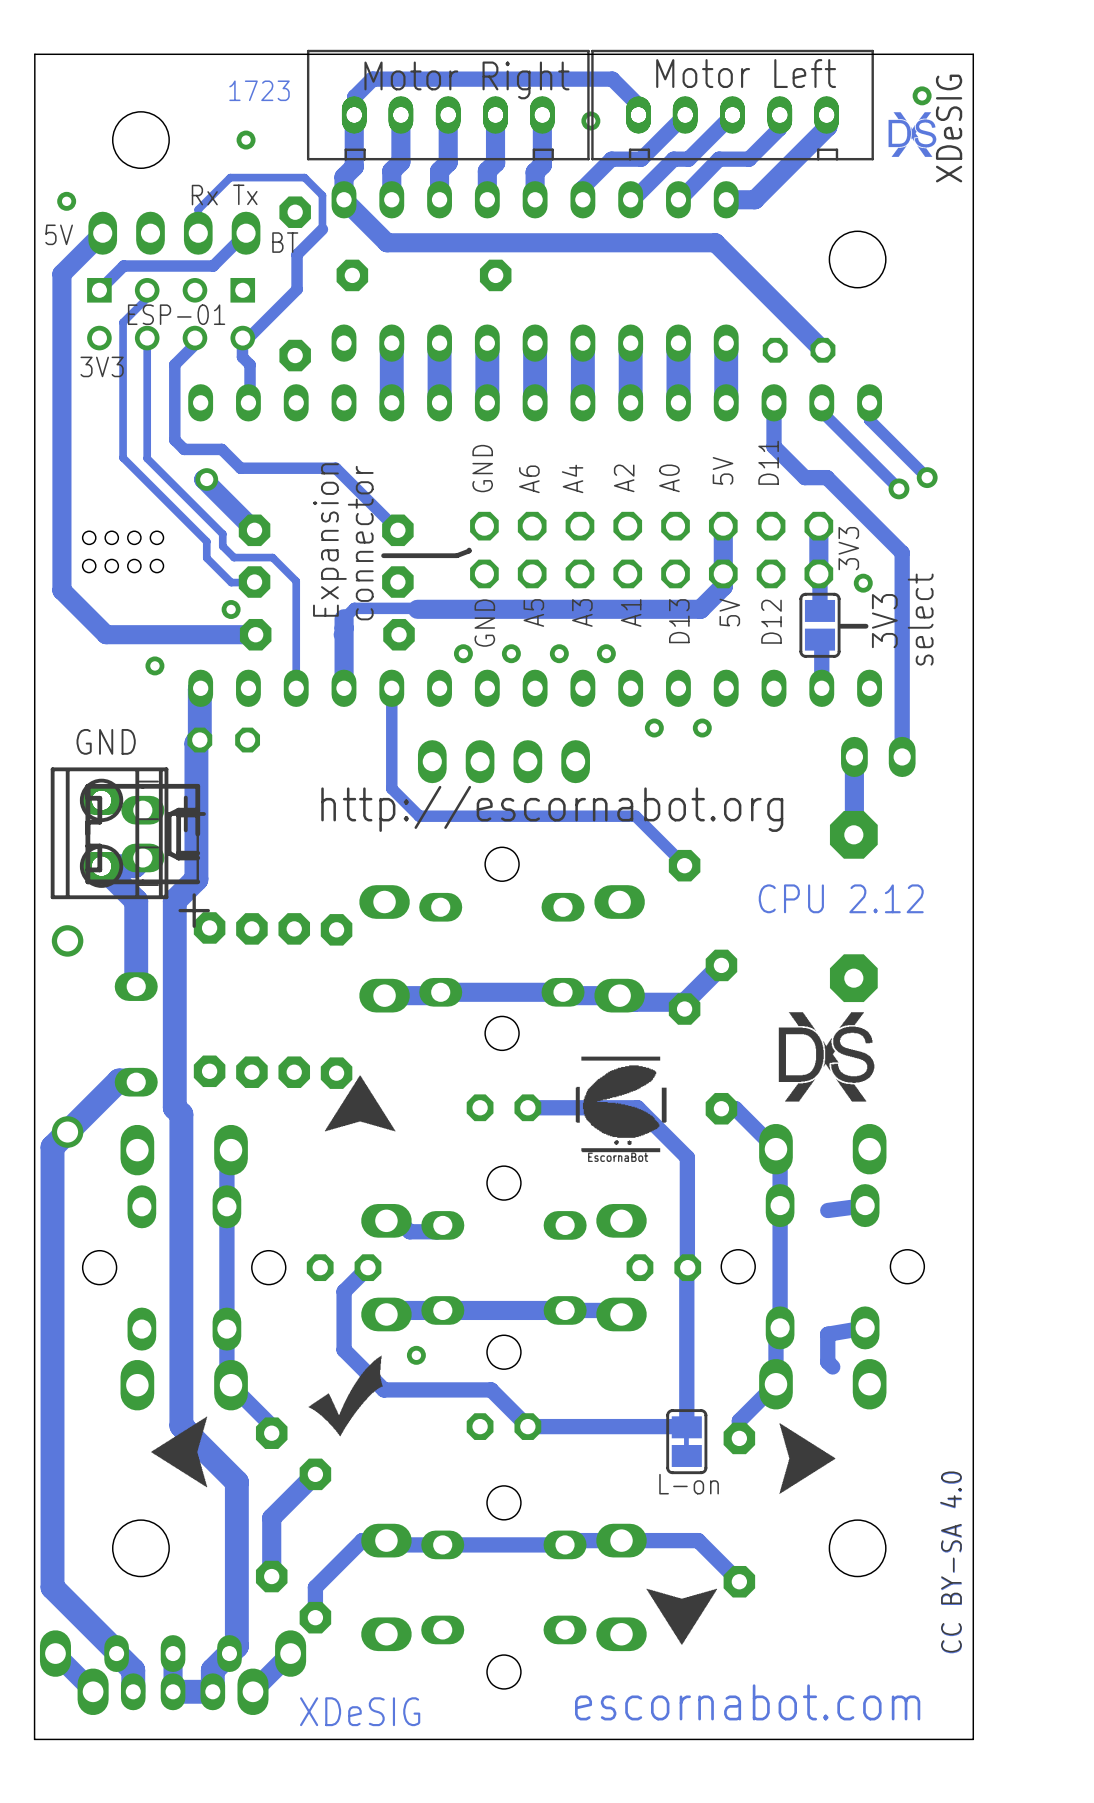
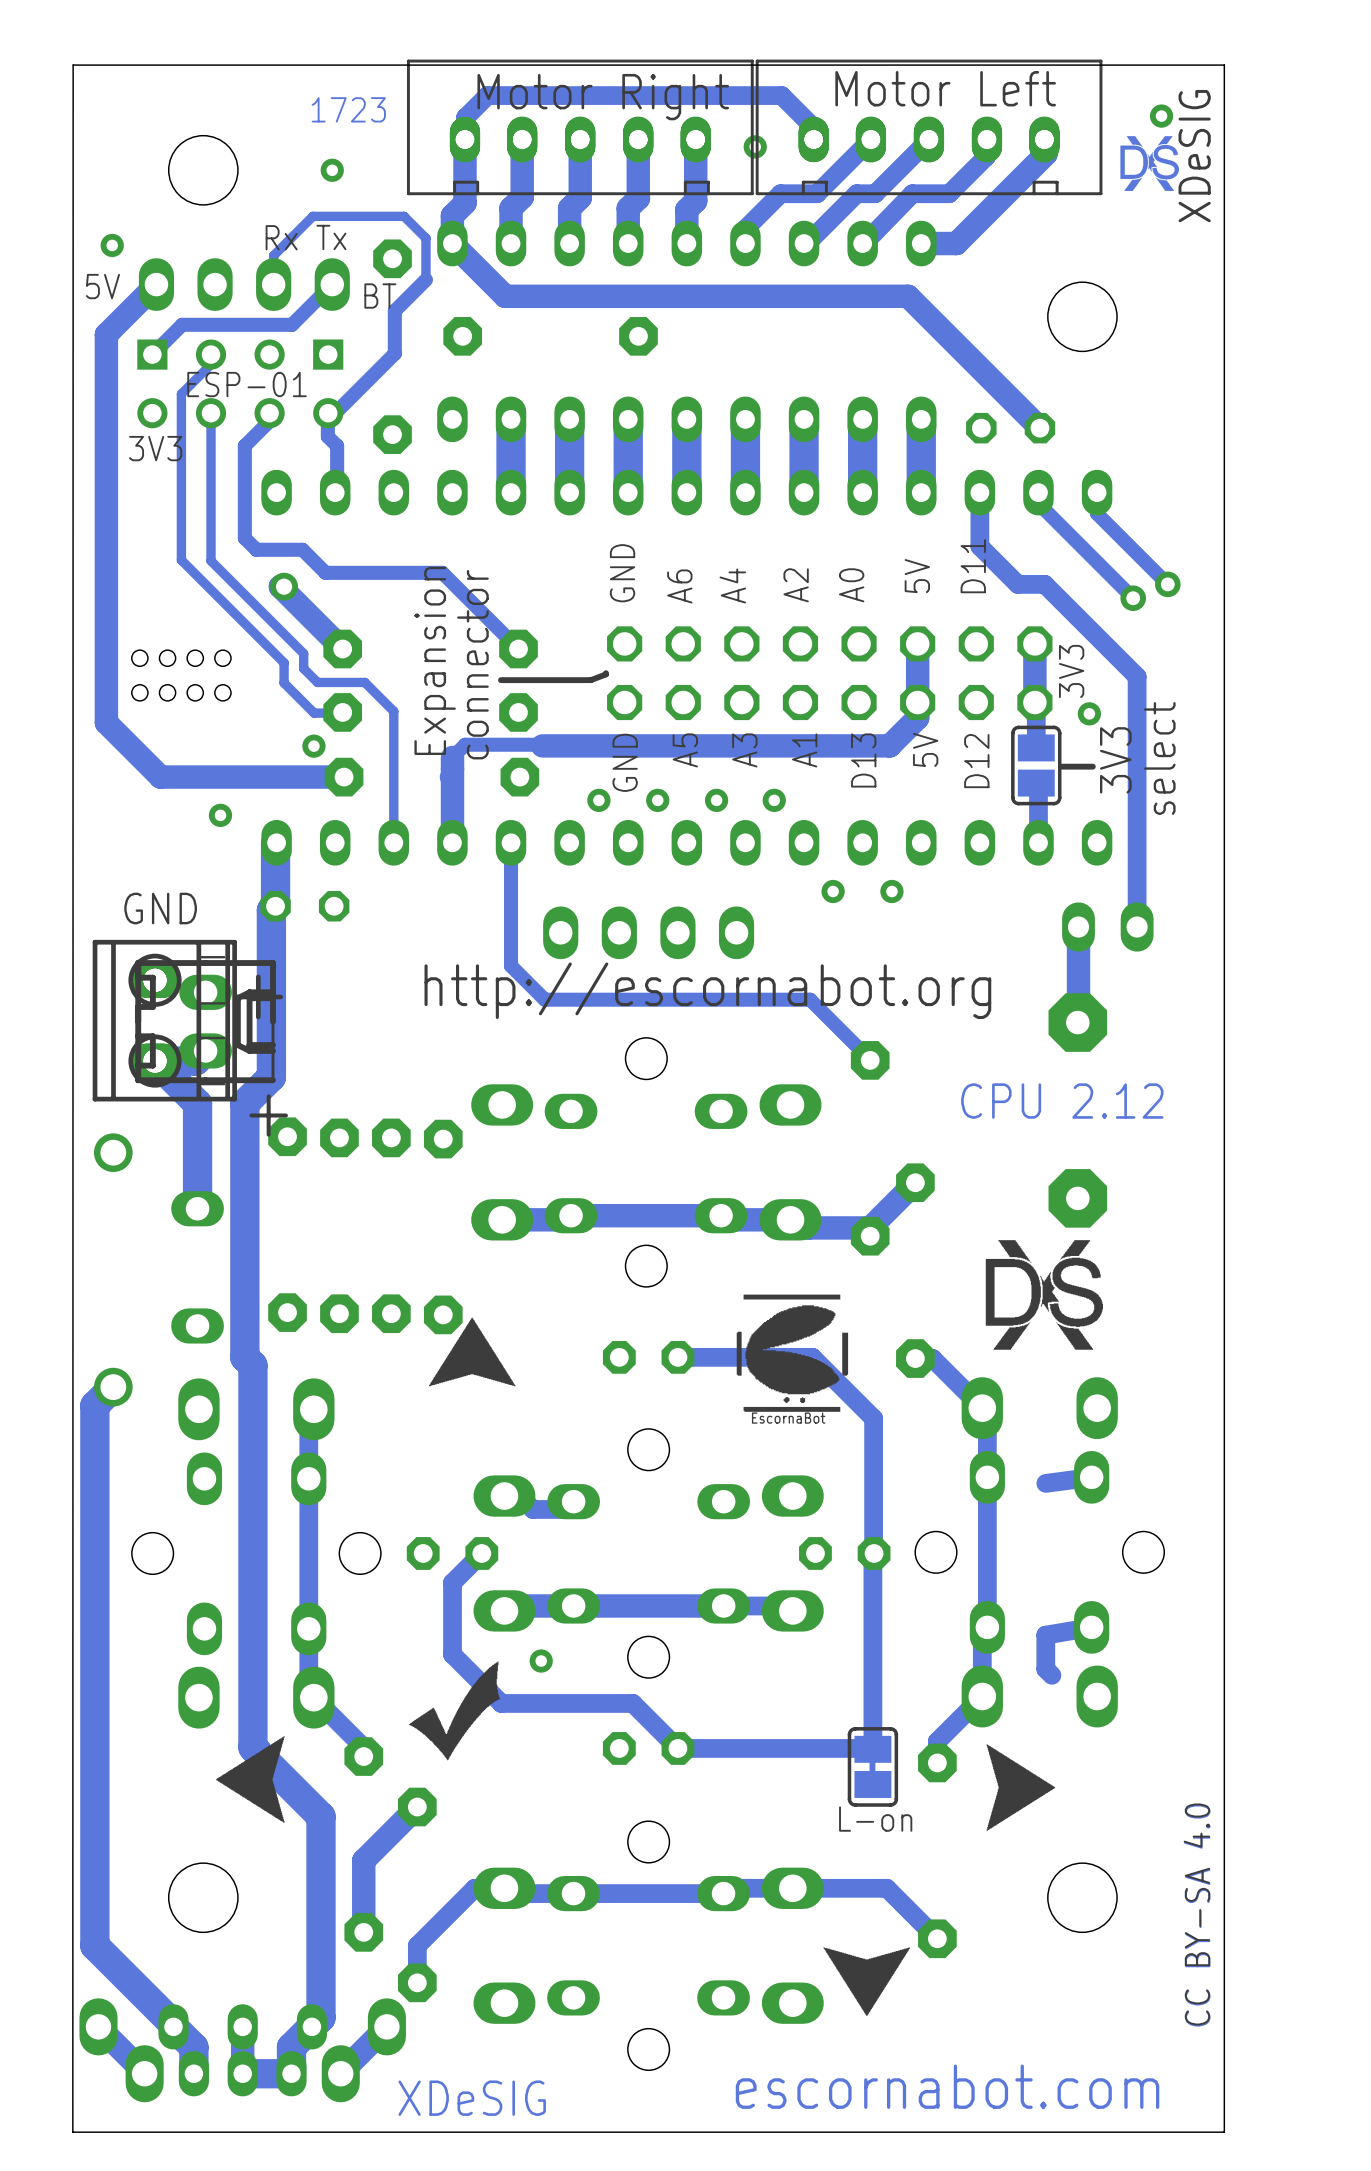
track: (134, 1080) (119, 1080) (67, 1132) -> none

